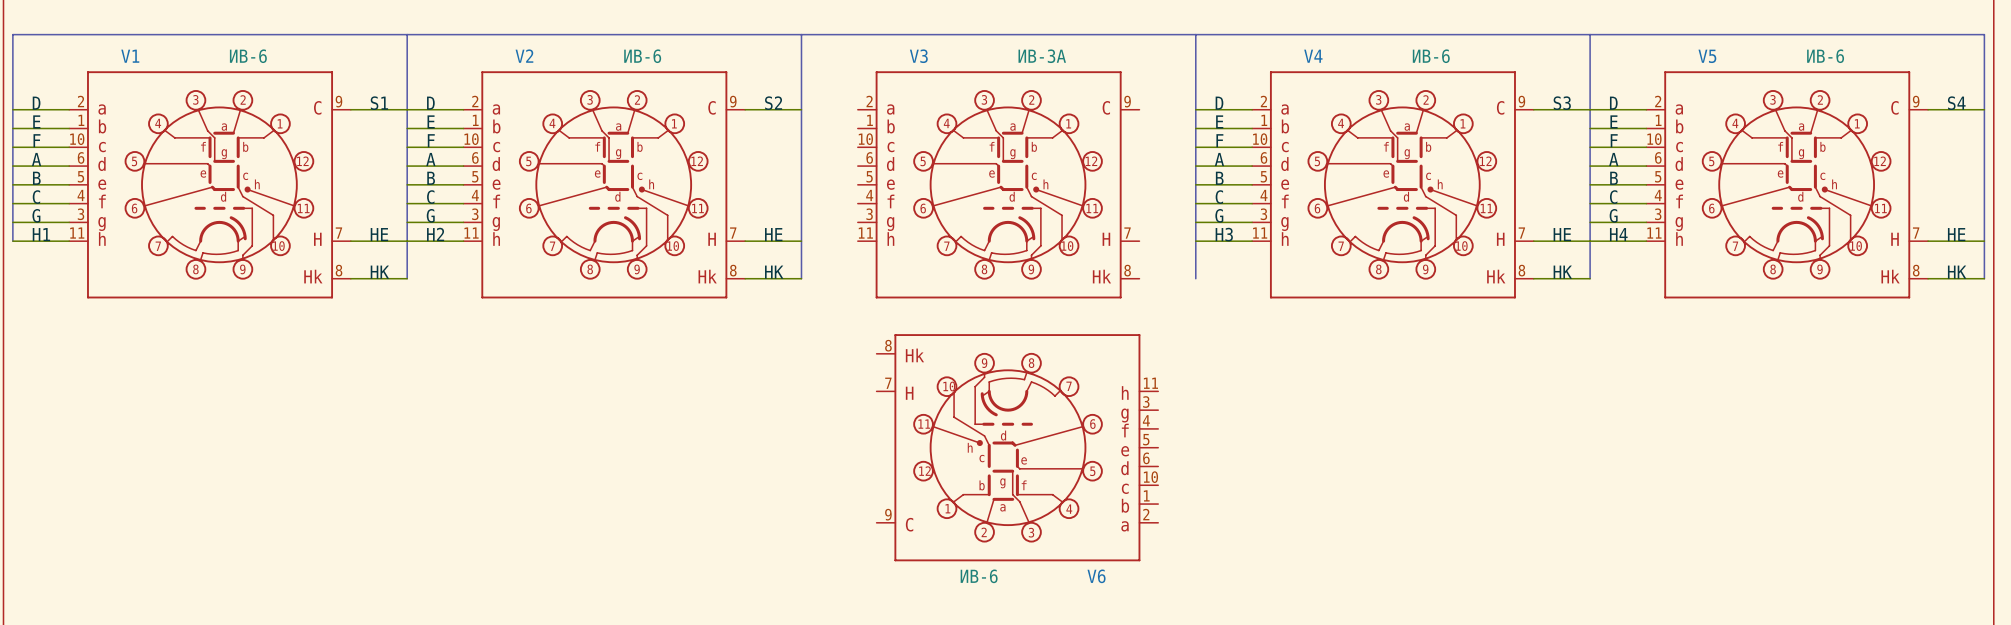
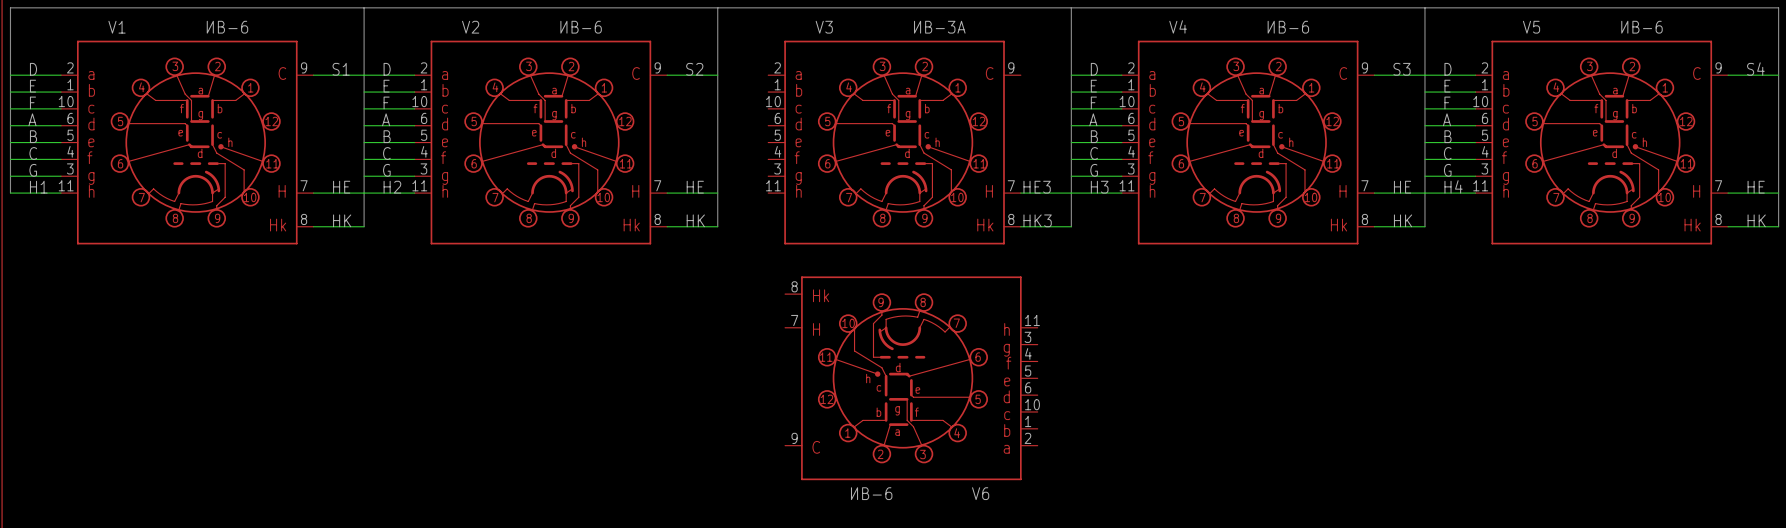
label: none -> HE3 (1037, 187)
wire: none -> (1020, 193) (1071, 193)
label: none -> HK3 (1037, 220)
wire: none -> (1020, 226) (1071, 226)

